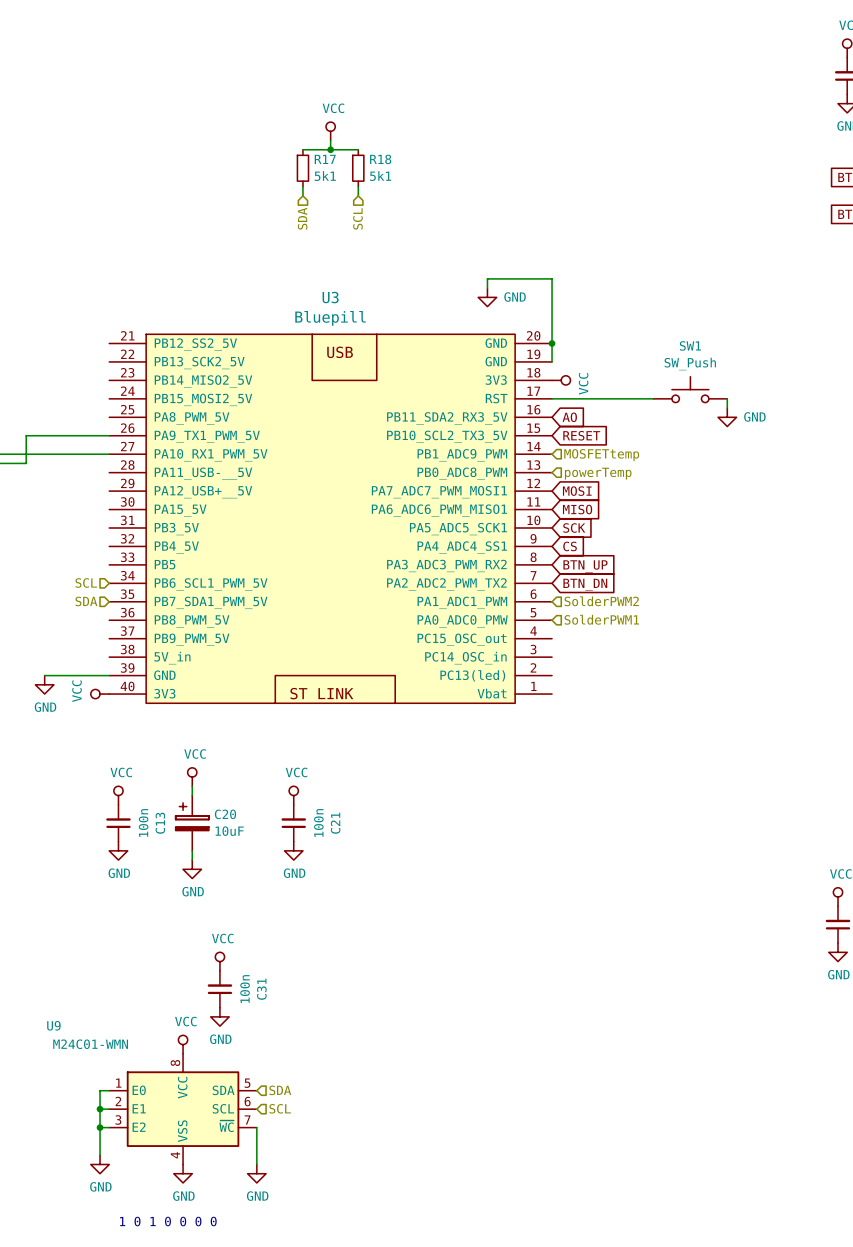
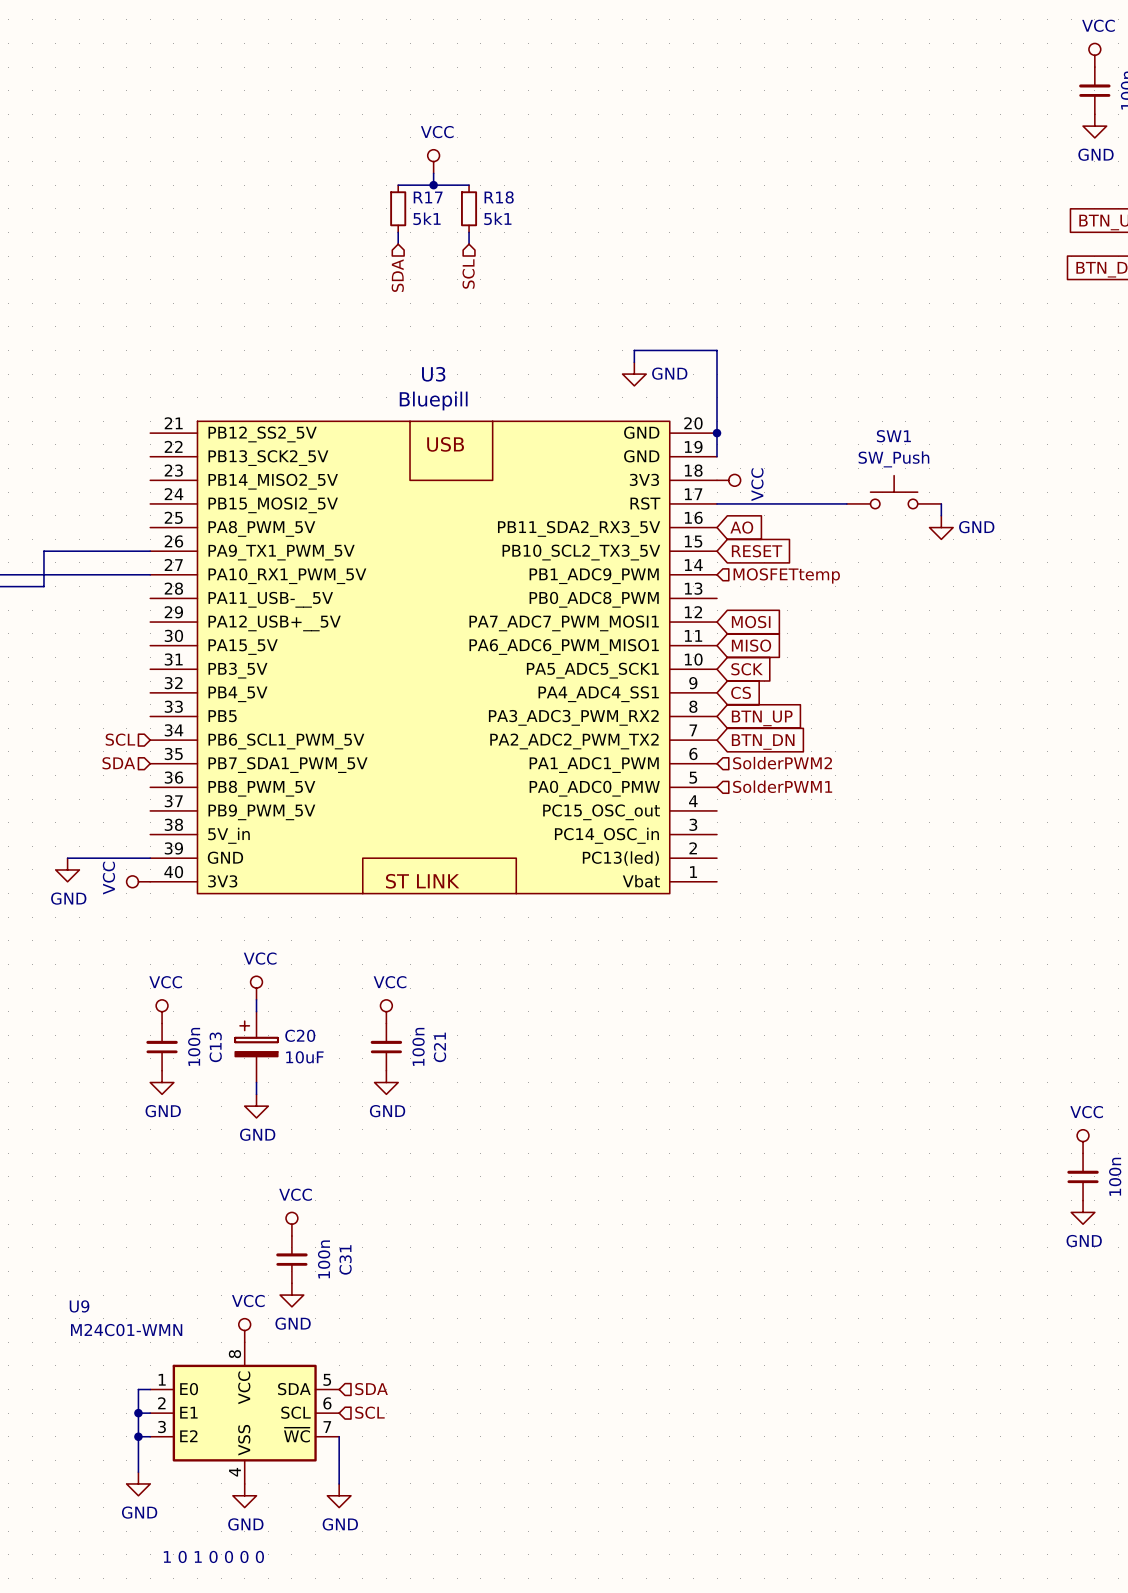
hierarchical label: powerTemp (598, 473) -> none

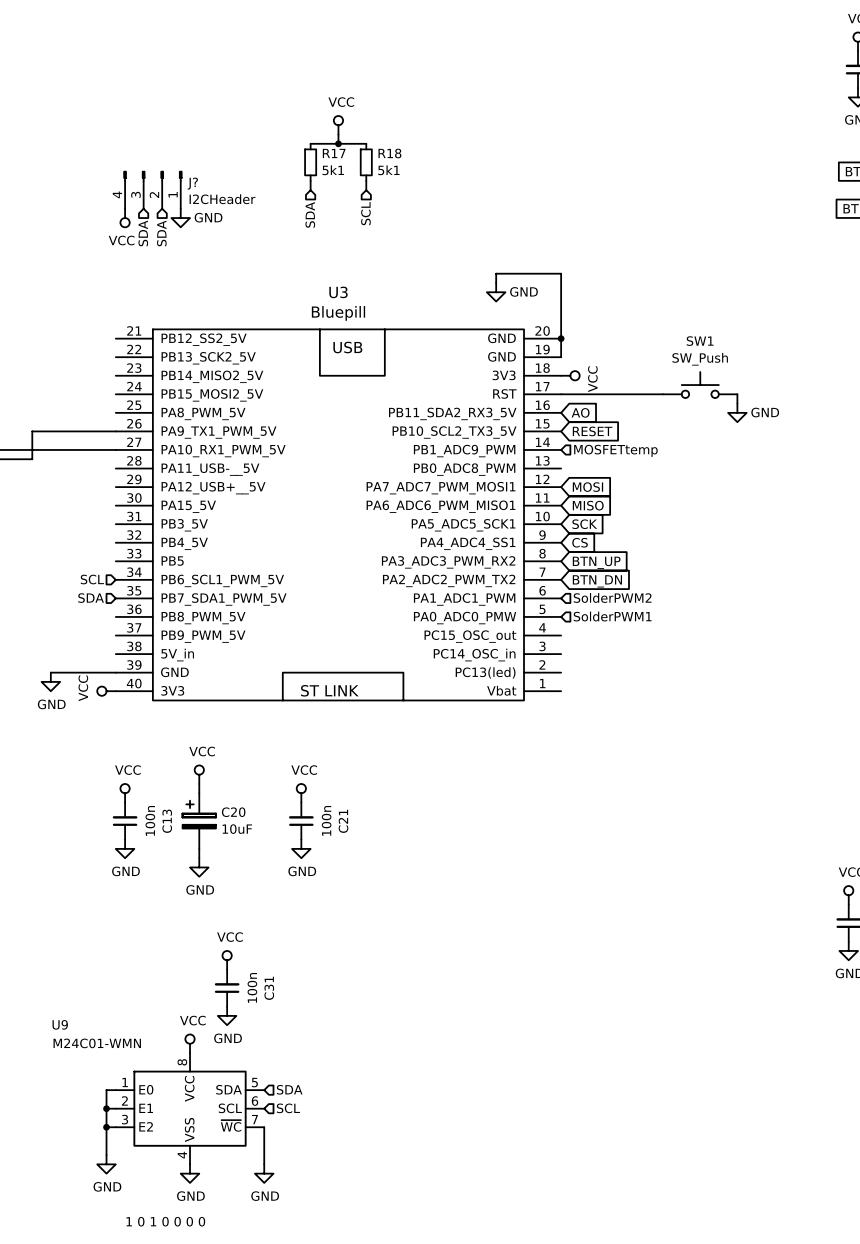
J?: none -> I2CHeader (152, 189)
power symbol: none -> VCC (125, 218)
power symbol: none -> GND (180, 218)
hierarchical label: none -> SDA (143, 233)
hierarchical label: none -> SDA (161, 233)

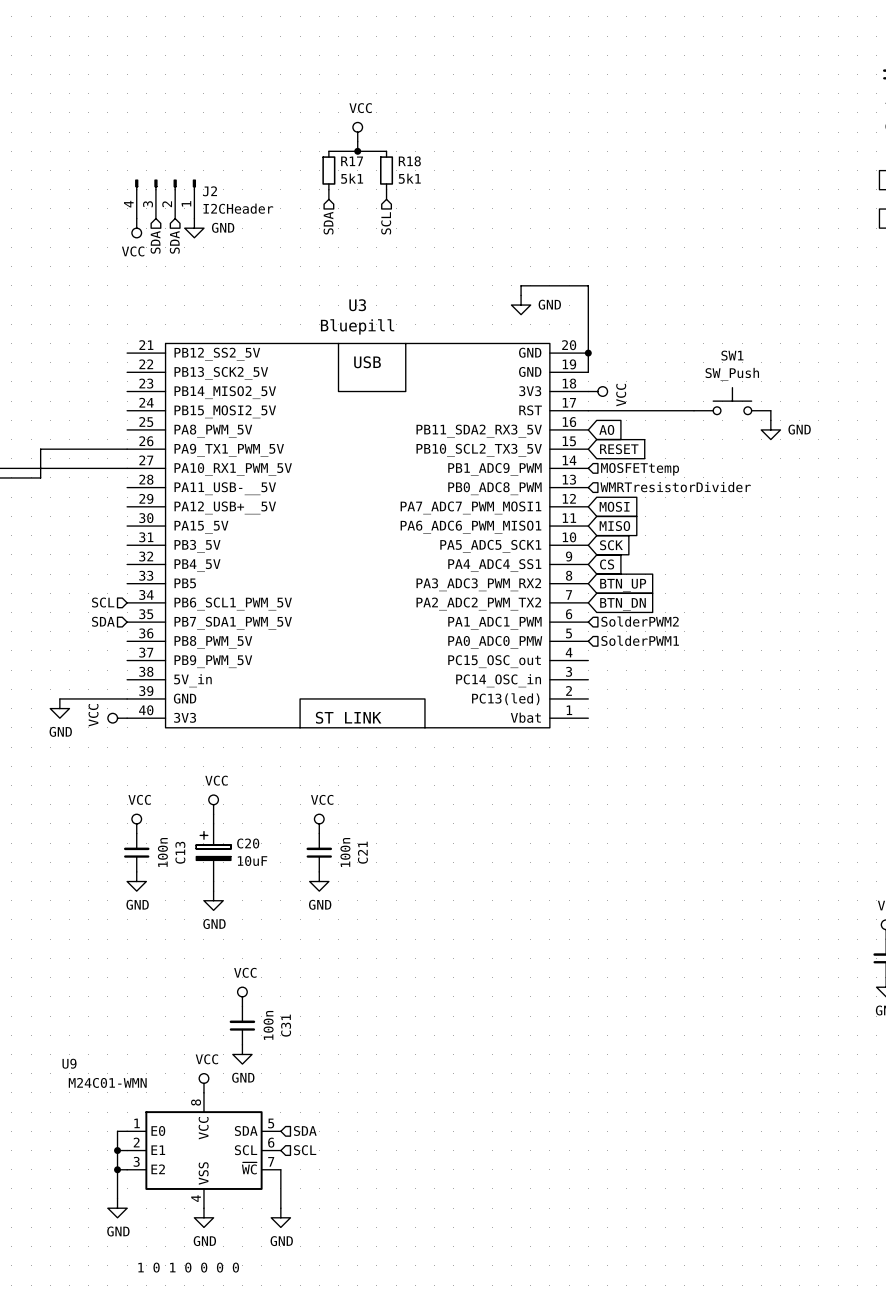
J? name: J? (192, 183) -> J2 (209, 191)
hierarchical label: none -> WMRTresistorDivider (675, 487)

